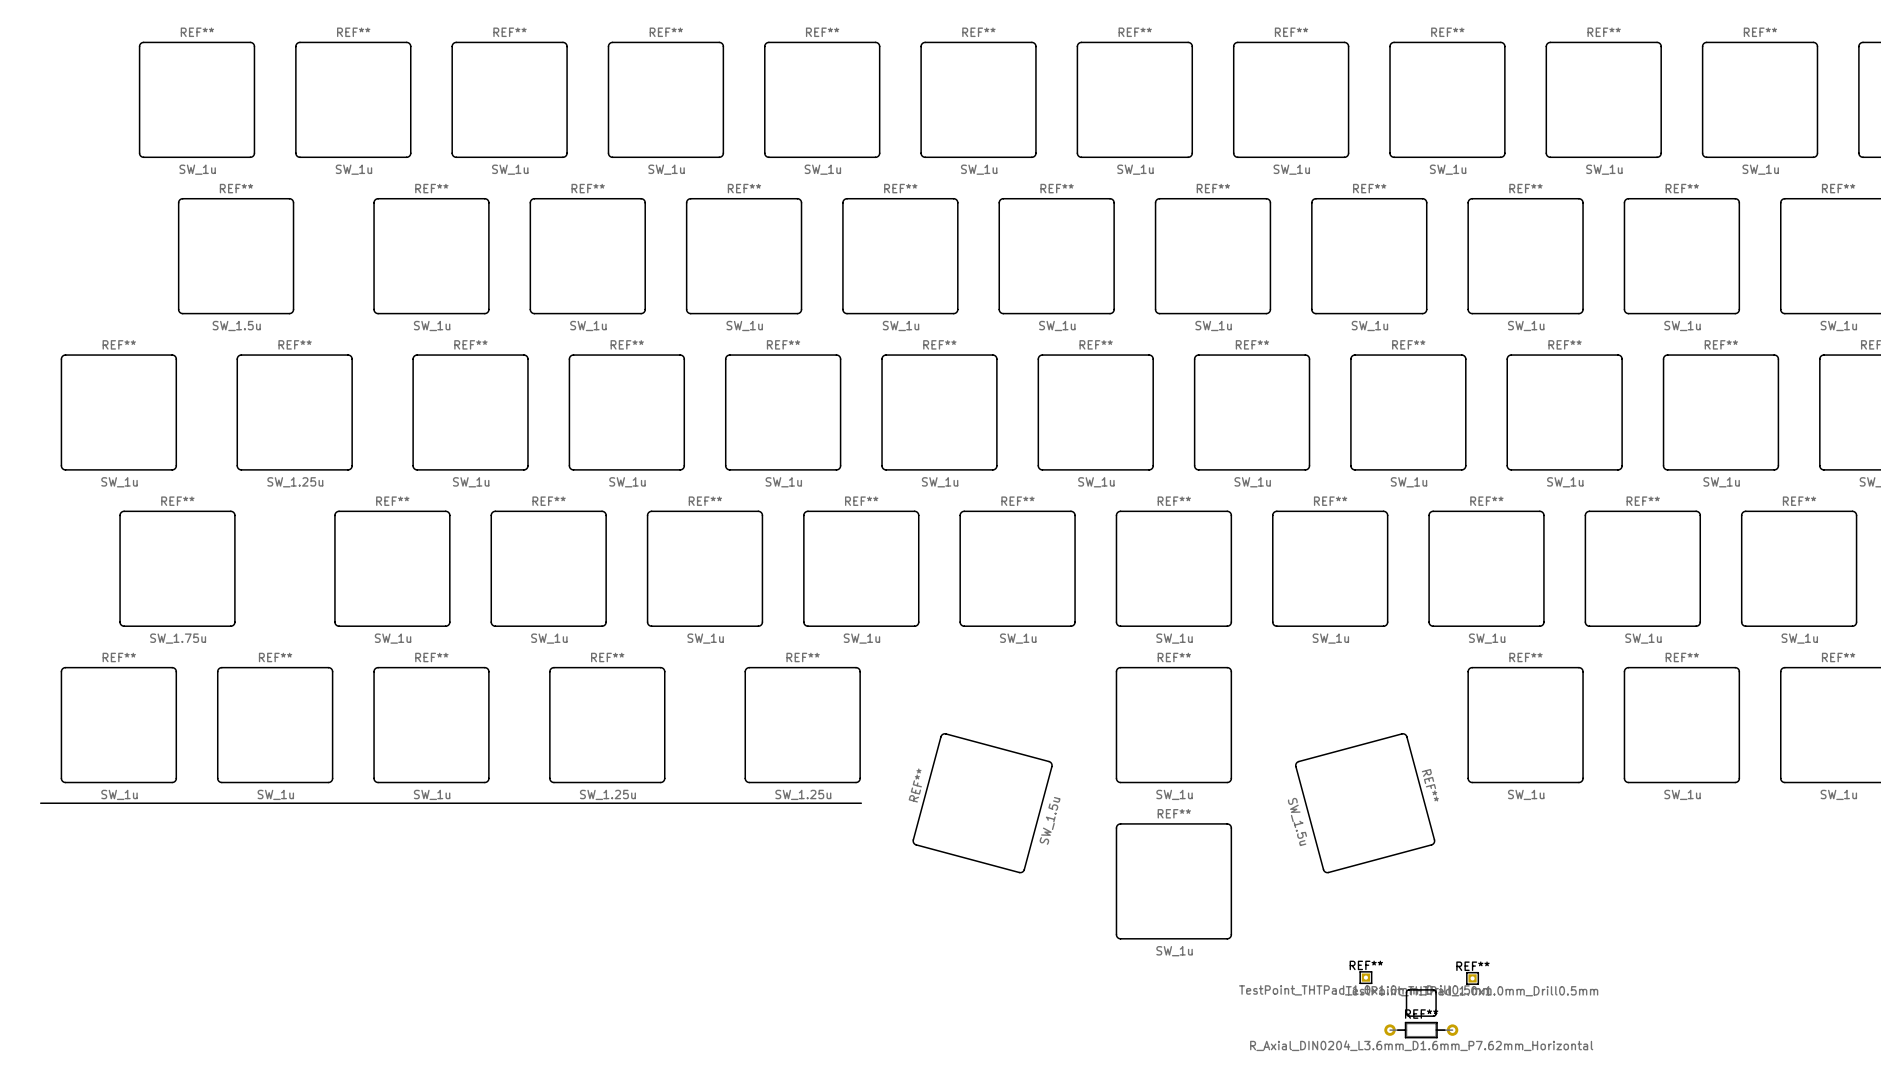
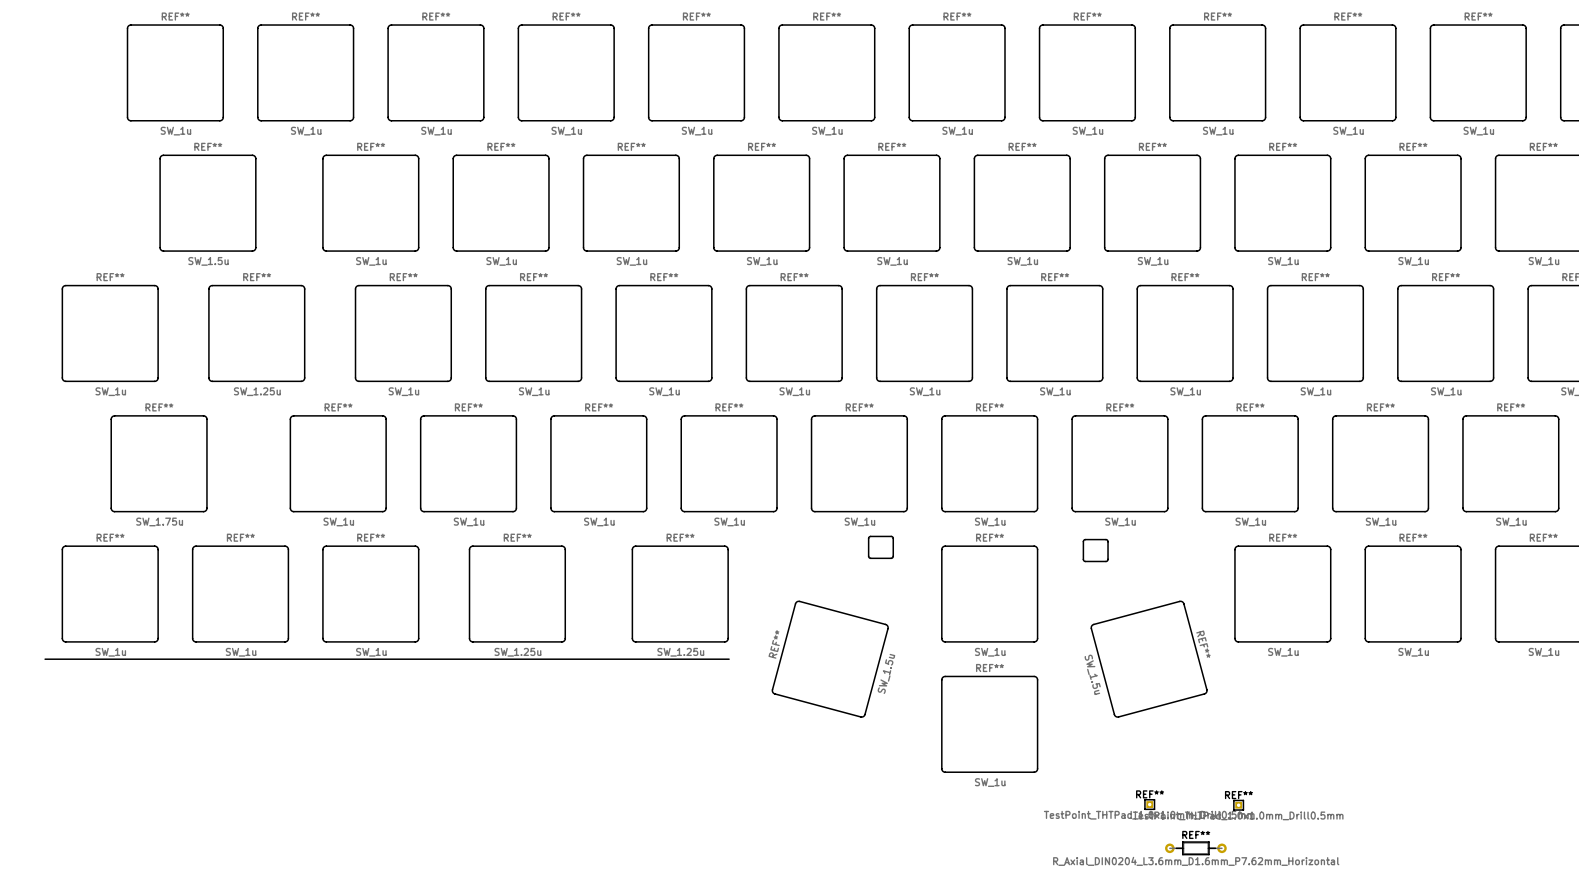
part: none -> (880, 547)
part: none -> (1095, 550)
part: (1421, 1003) -> none

